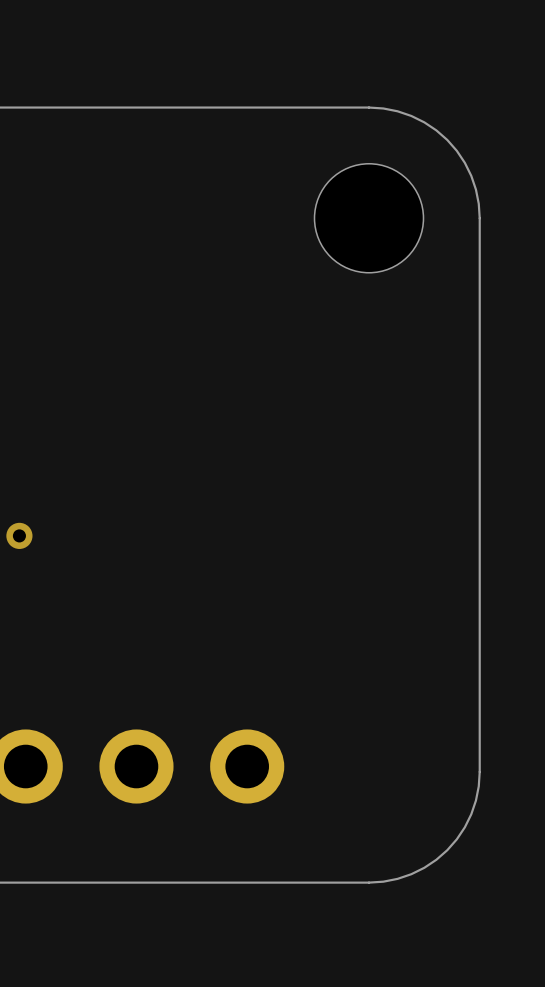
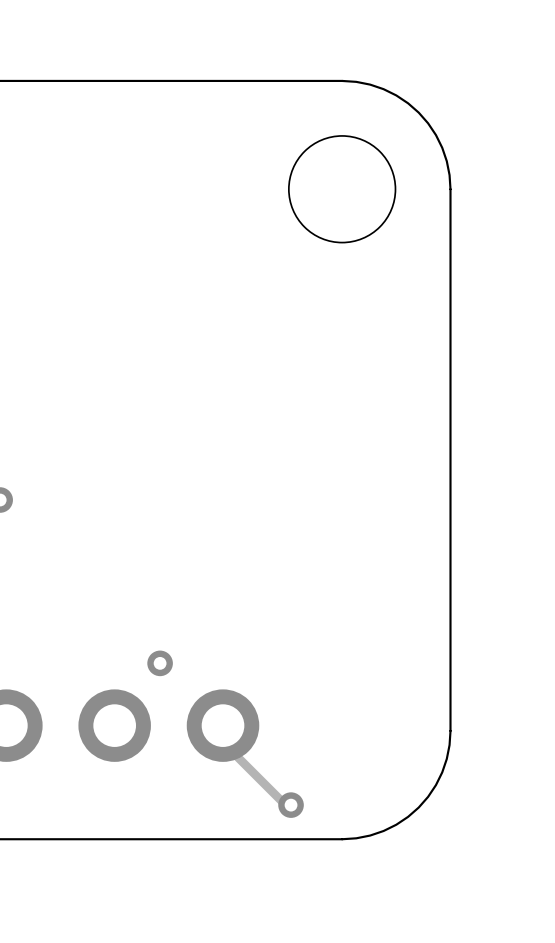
via: none -> (160, 663)
track: none -> (217, 737) (285, 805) (291, 805)
via: none -> (291, 805)

